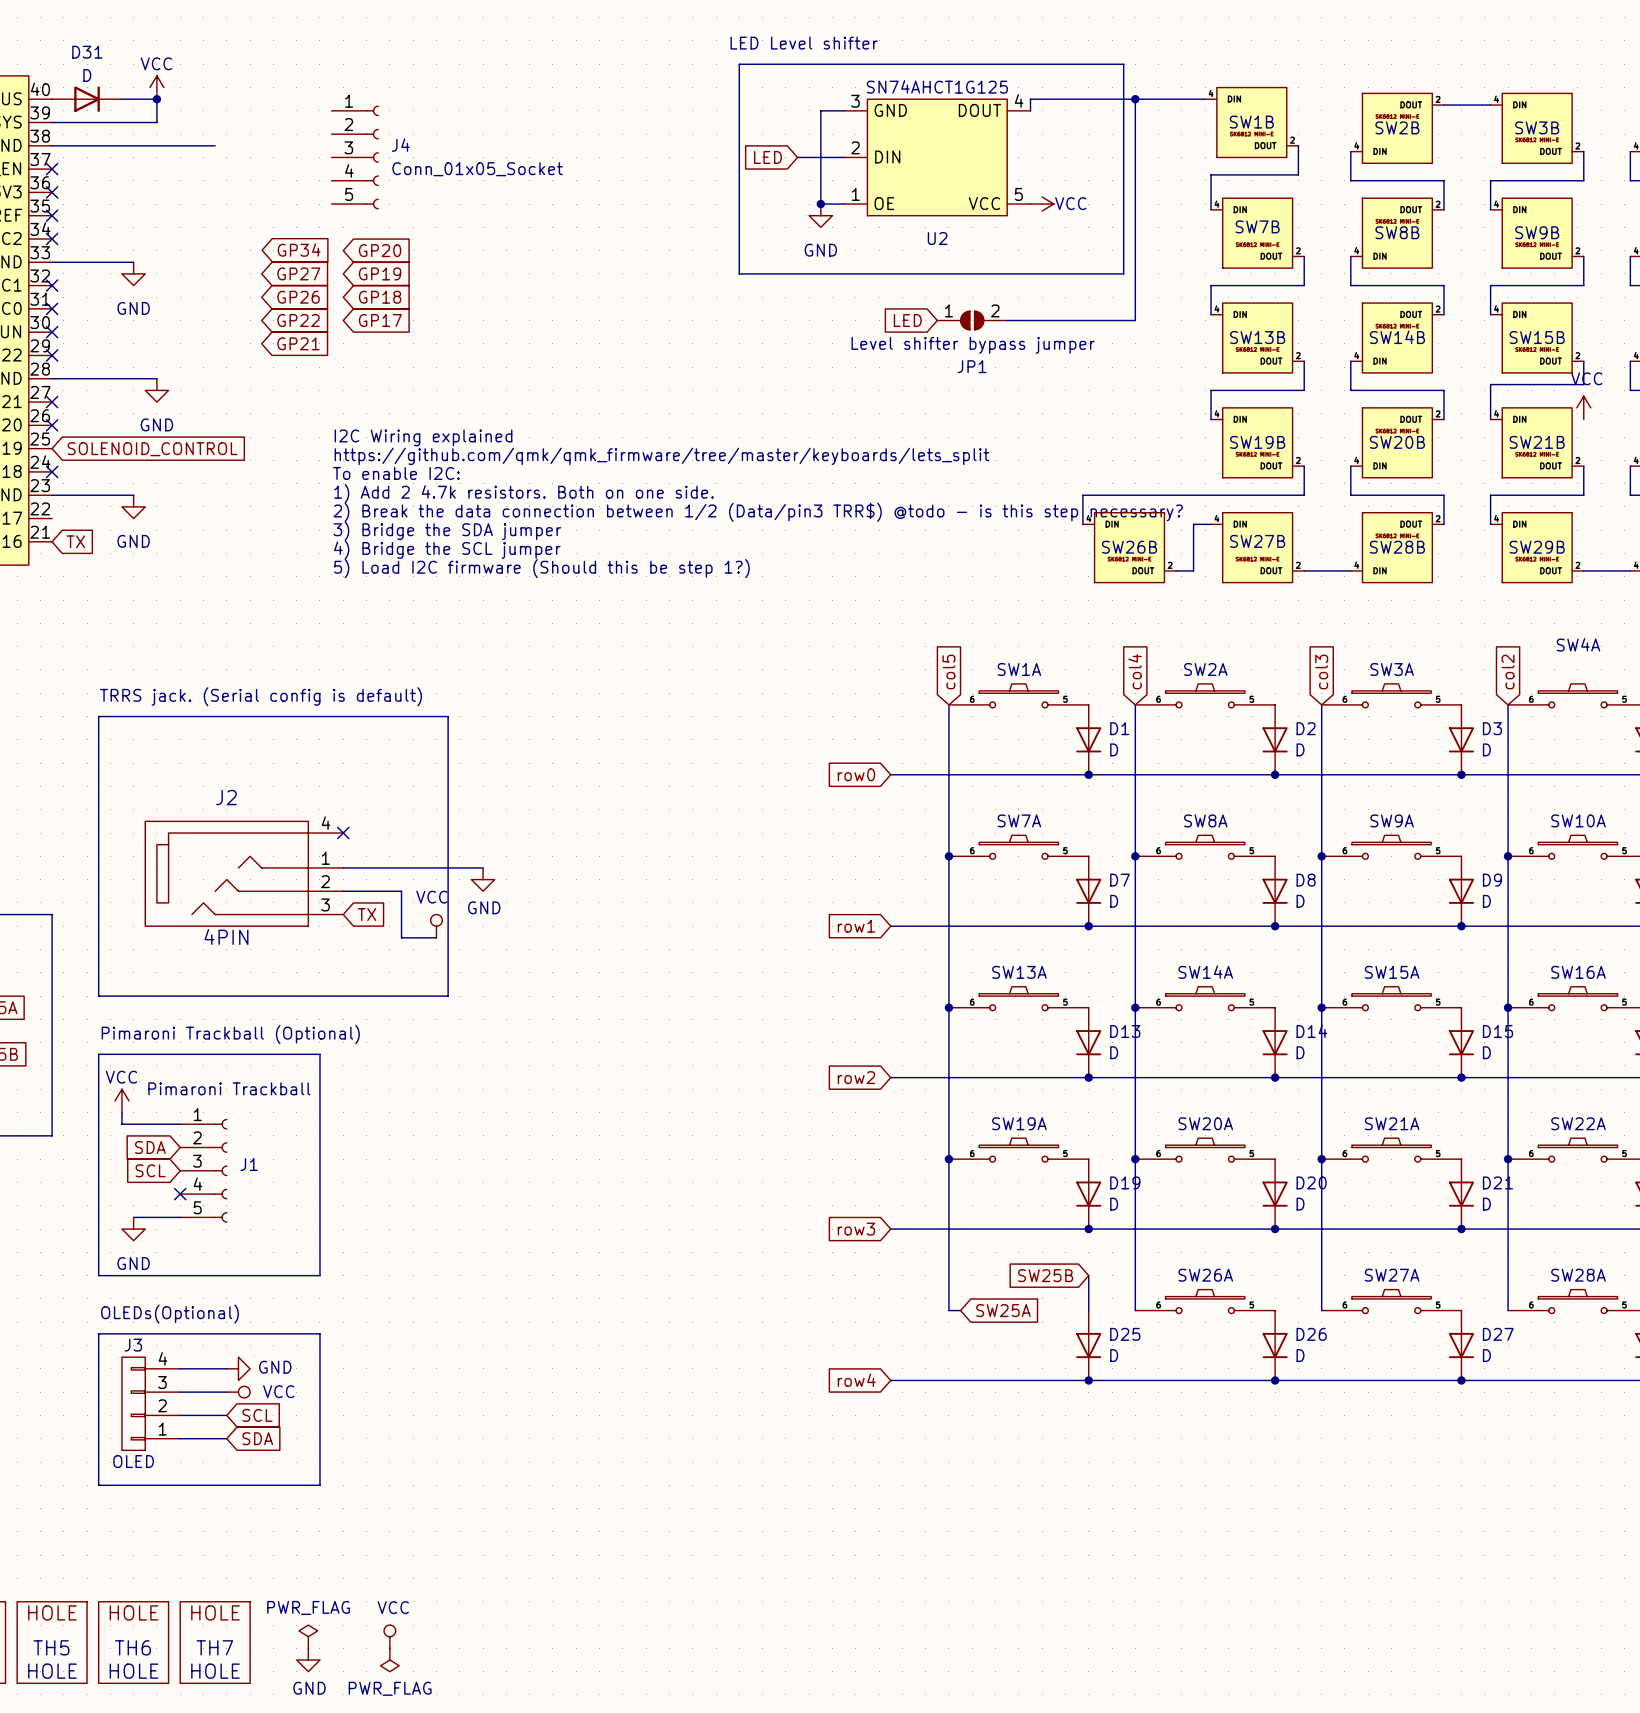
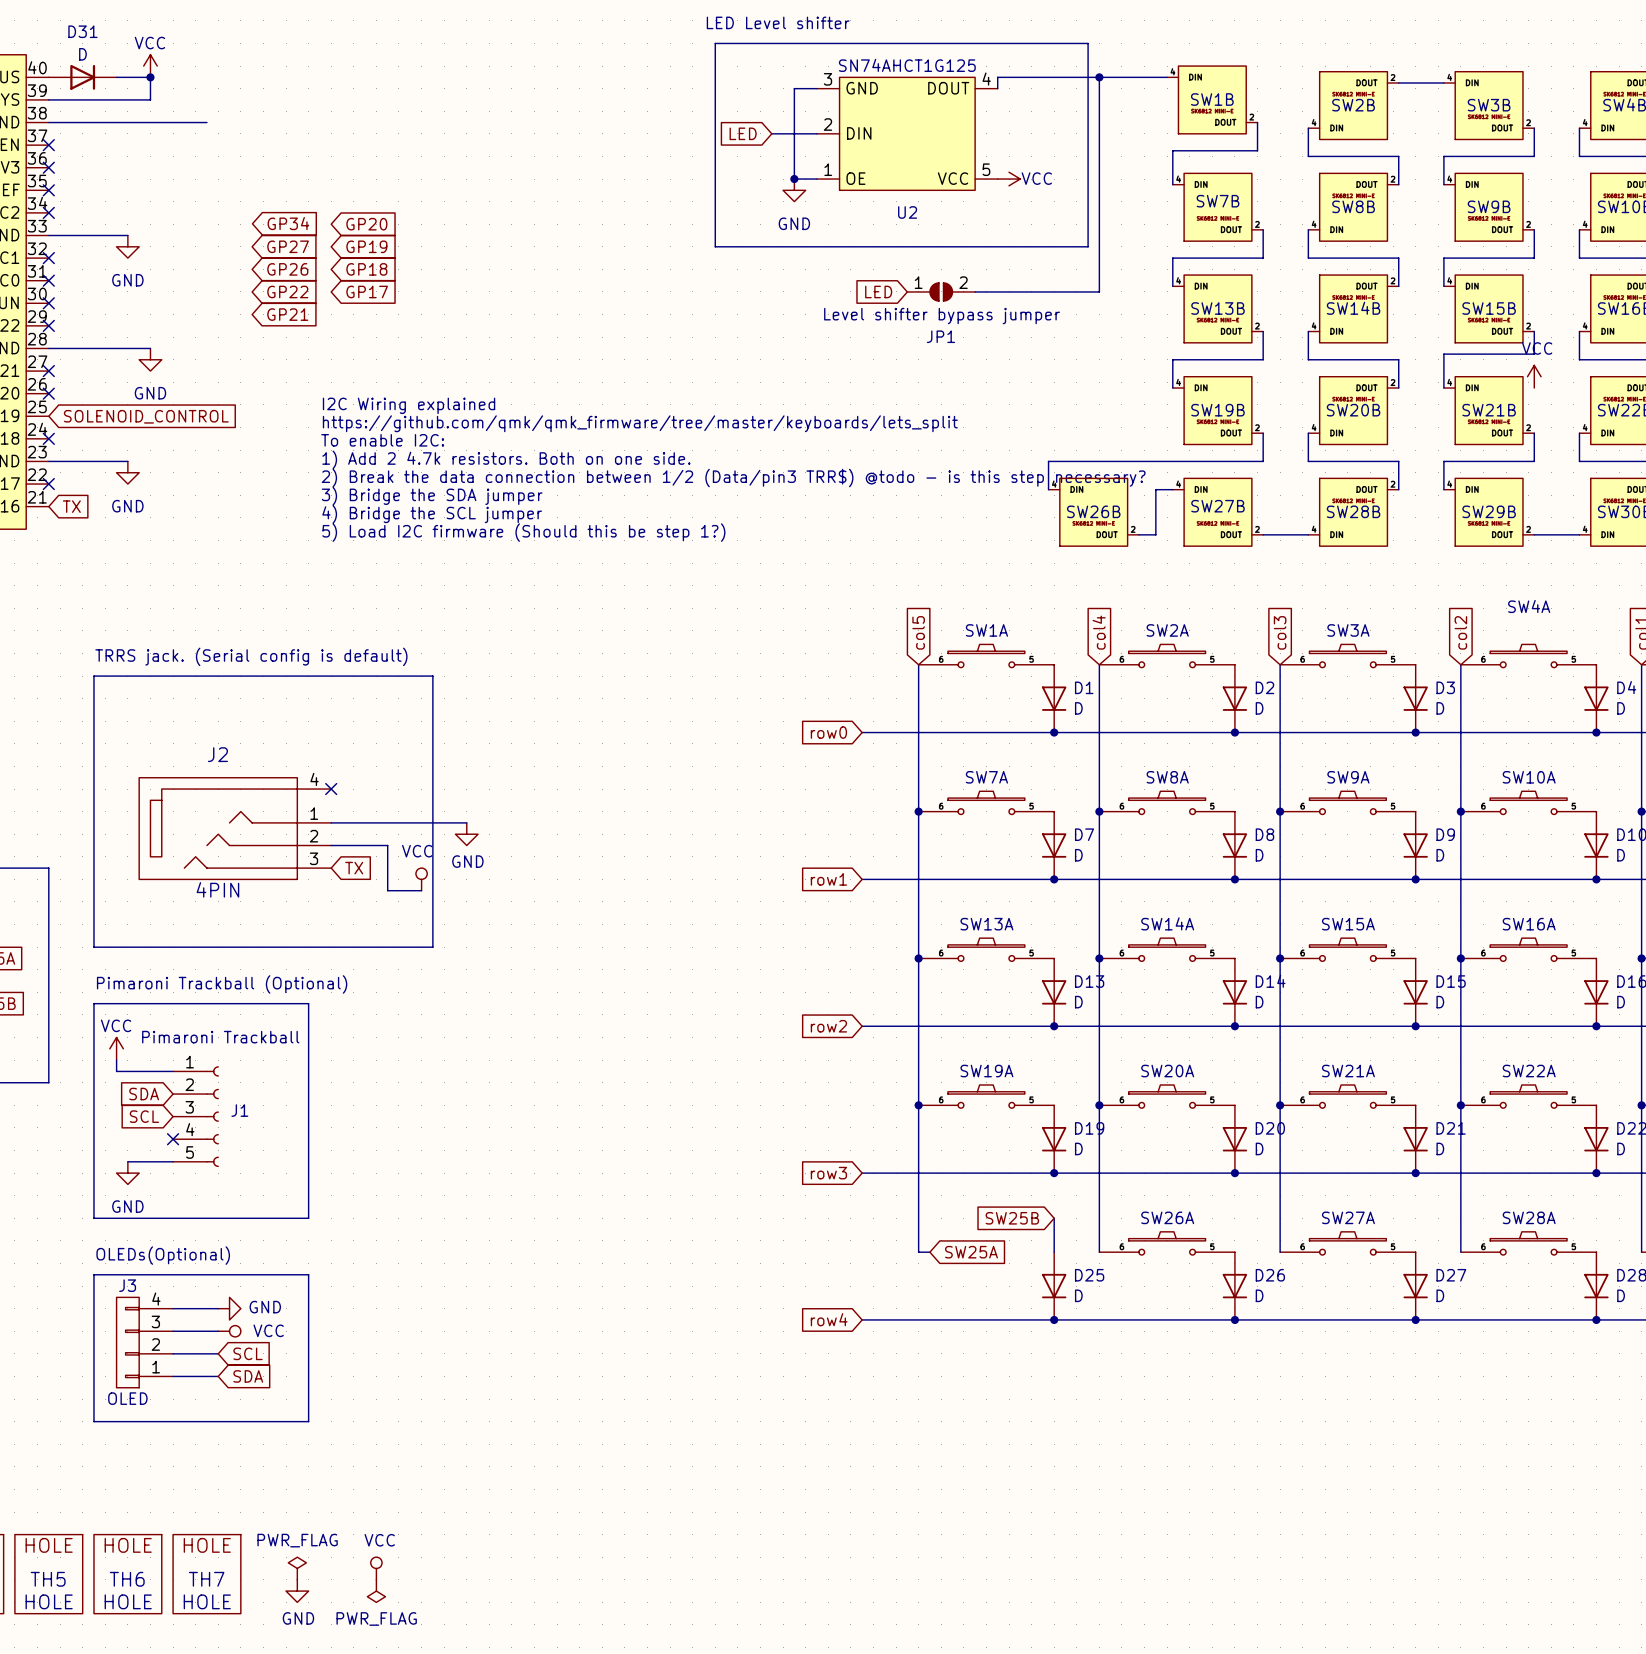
J4: Conn_01x05_Socket (355, 157) -> none
no-connect mark: none -> (48, 484)

